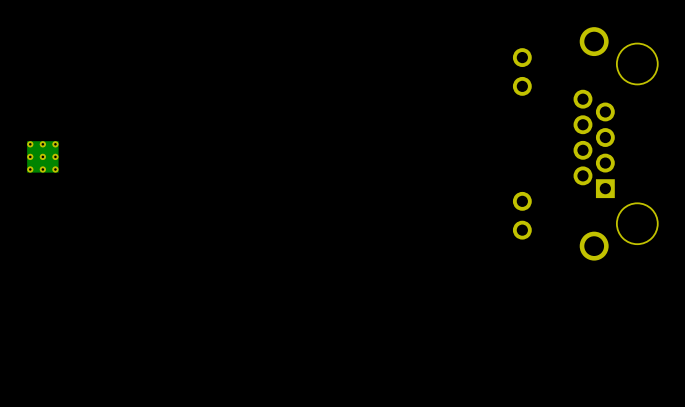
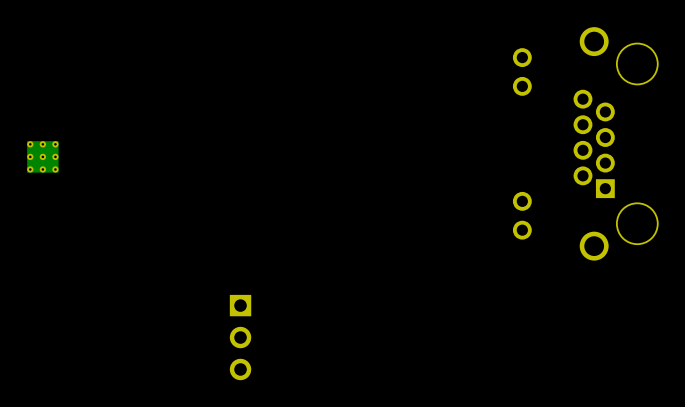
part: none -> (240, 337)

